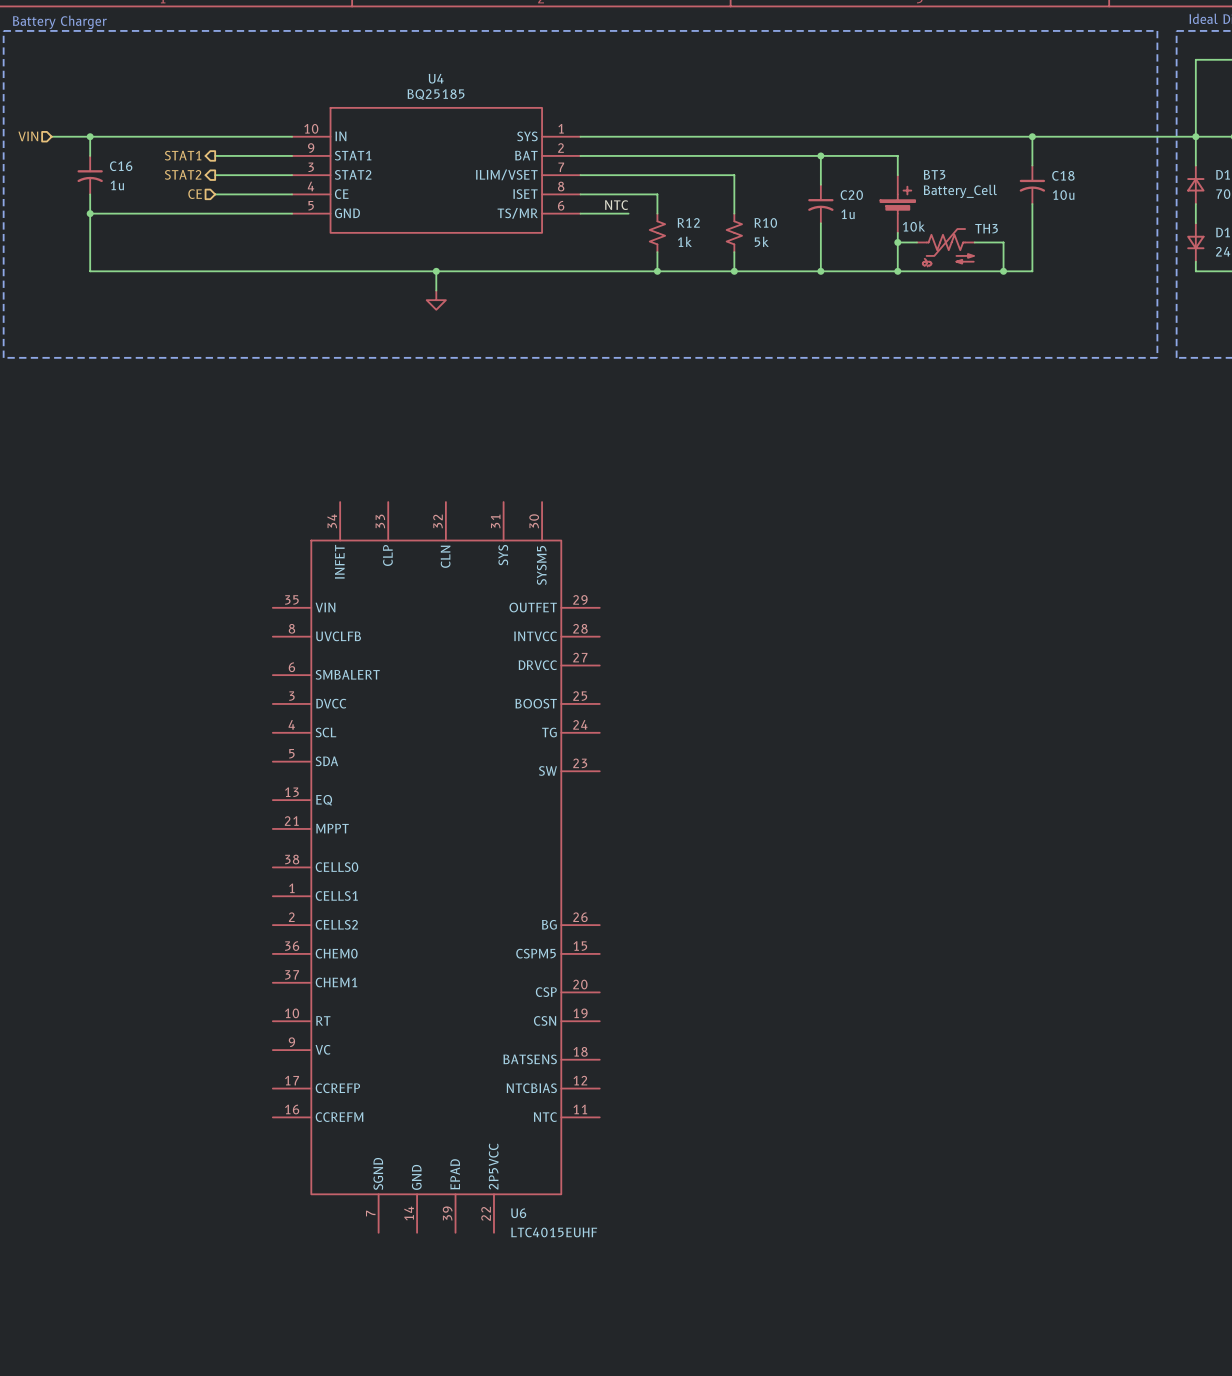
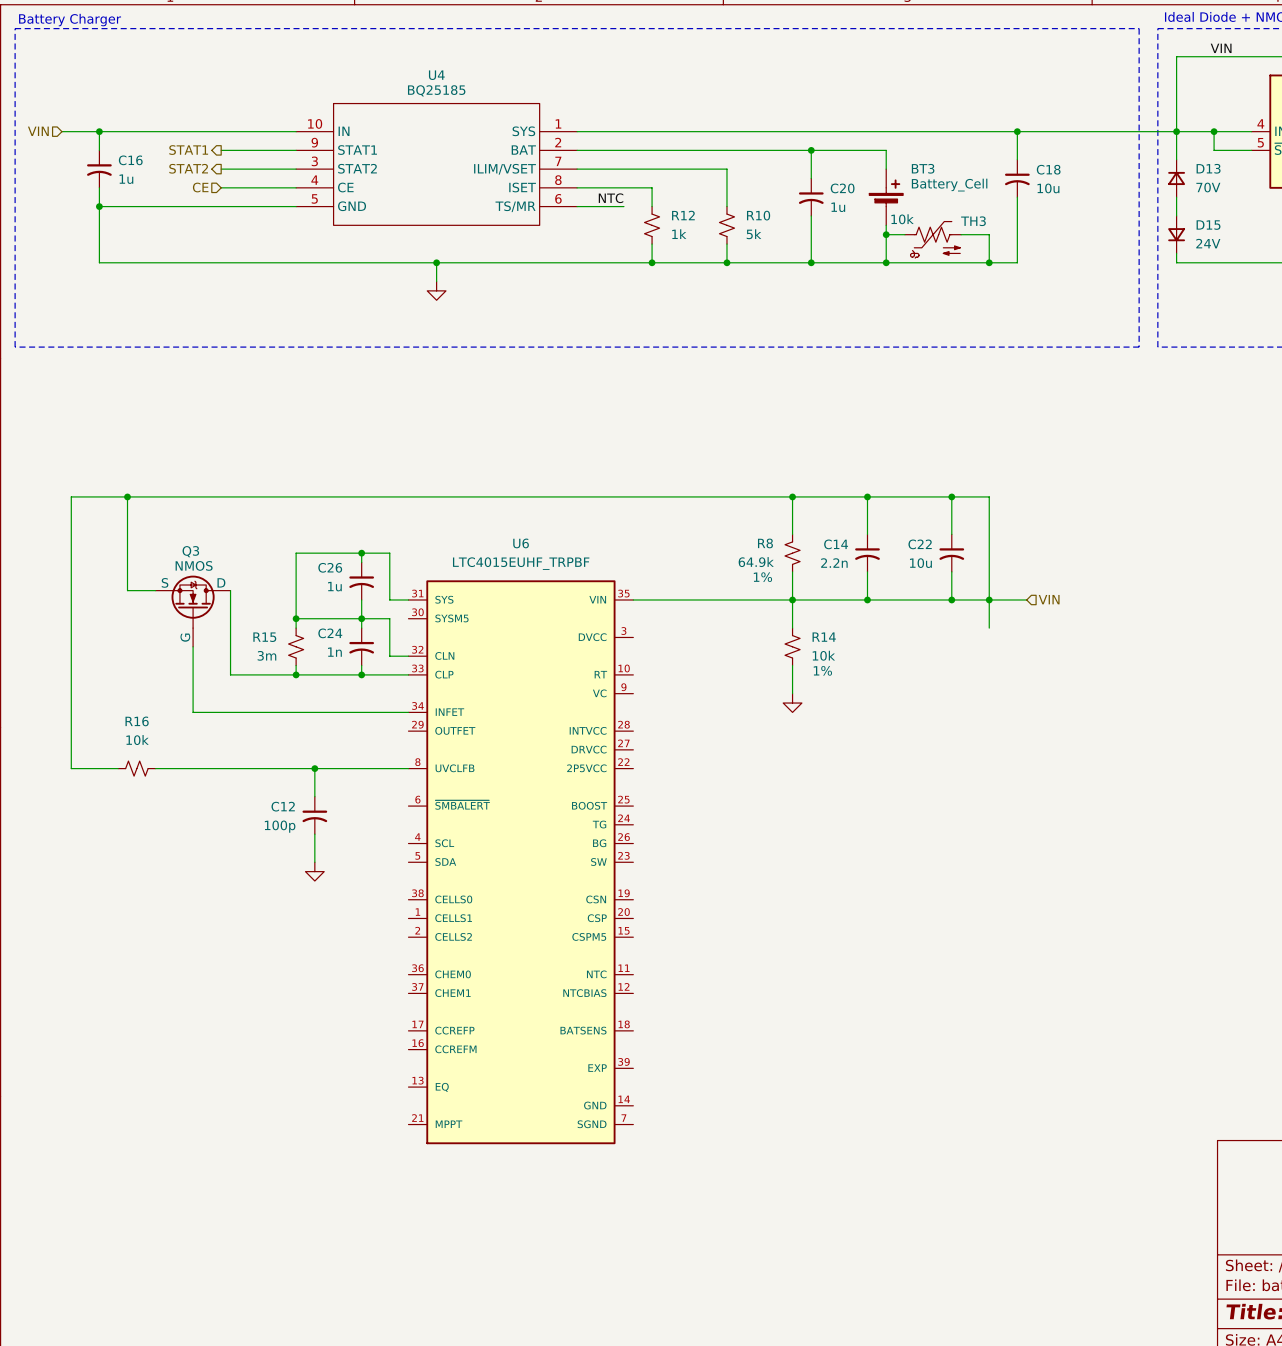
U6 symbol: [272, 502, 600, 1233] -> [408, 580, 634, 1145]
wire: none -> (127, 496) (127, 590) (155, 590)
junction: none -> (127, 496)
wire: none -> (792, 496) (792, 534)
junction: none -> (792, 496)
wire: none -> (867, 496) (867, 534)
junction: none -> (867, 496)
wire: none -> (951, 496) (951, 534)
junction: none -> (951, 496)
wire: none -> (361, 553) (361, 562)
junction: none -> (361, 553)
R8: none -> 64.9k (792, 553)
C14: none -> 2.2n (867, 553)
C22: none -> 10u (951, 553)
wire: none -> (792, 571) (792, 628)
wire: none -> (867, 571) (867, 599)
wire: none -> (951, 571) (951, 599)
C26: none -> 1u (361, 581)
wire: none -> (230, 590) (230, 674) (408, 674)
wire: none -> (361, 599) (361, 628)
wire: none -> (408, 599) (389, 599) (389, 553) (296, 553) (296, 628)
wire: none -> (633, 599) (1026, 599)
junction: none -> (792, 599)
junction: none -> (867, 599)
junction: none -> (951, 599)
junction: none -> (989, 599)
hierarchical label: none -> VIN (1049, 599)
Q3: none -> NMOS (193, 611)
wire: none -> (296, 618) (389, 618) (389, 656) (408, 656)
junction: none -> (296, 618)
junction: none -> (361, 618)
wire: none -> (989, 628) (989, 496) (71, 496) (71, 768) (118, 768)
wire: none -> (193, 646) (193, 712) (408, 712)
R15: none -> 3m (296, 646)
C24: none -> 1n (361, 646)
R14: none -> 10k (792, 646)
wire: none -> (296, 665) (296, 674)
wire: none -> (361, 665) (361, 674)
wire: none -> (792, 665) (792, 693)
junction: none -> (296, 674)
junction: none -> (361, 674)
power symbol: none -> (792, 703)
R16: none -> 10k (136, 768)
wire: none -> (155, 768) (408, 768)
junction: none -> (314, 768)
C12: none -> 100p (314, 815)
power symbol: none -> (314, 871)
U6 name position: U6 (518, 1213) -> U6 (521, 543)
U6 value: LTC4015EUHF (554, 1232) -> LTC4015EUHF_TRPBF (521, 563)

